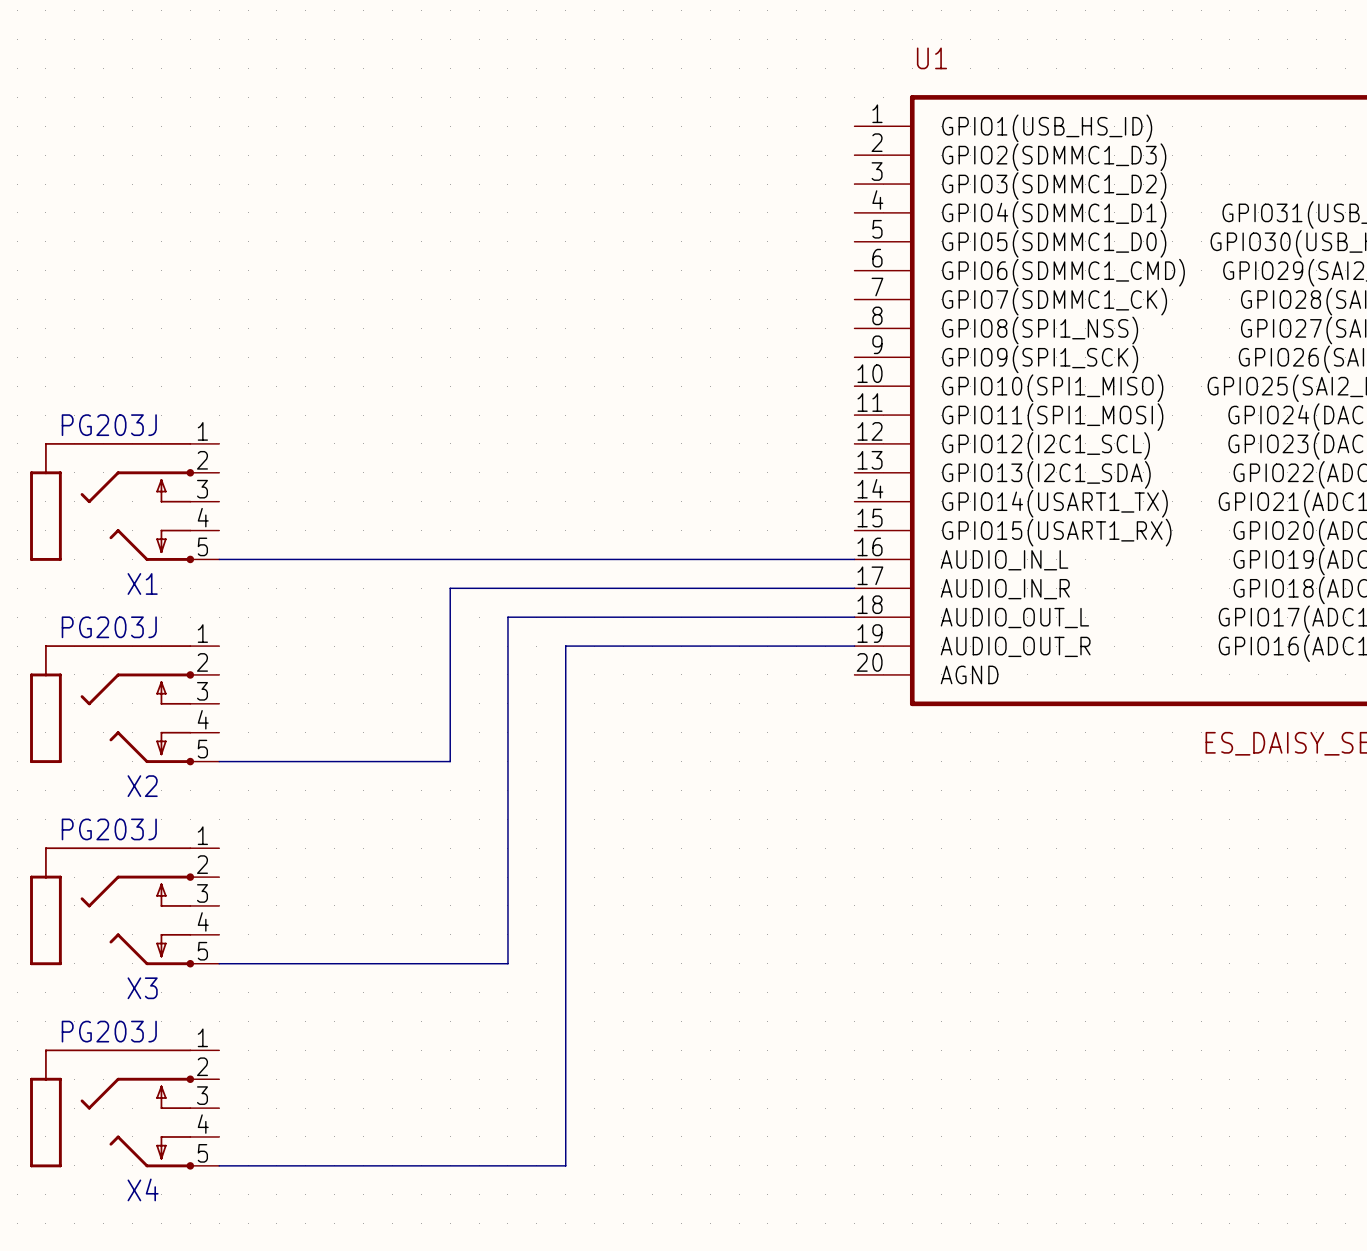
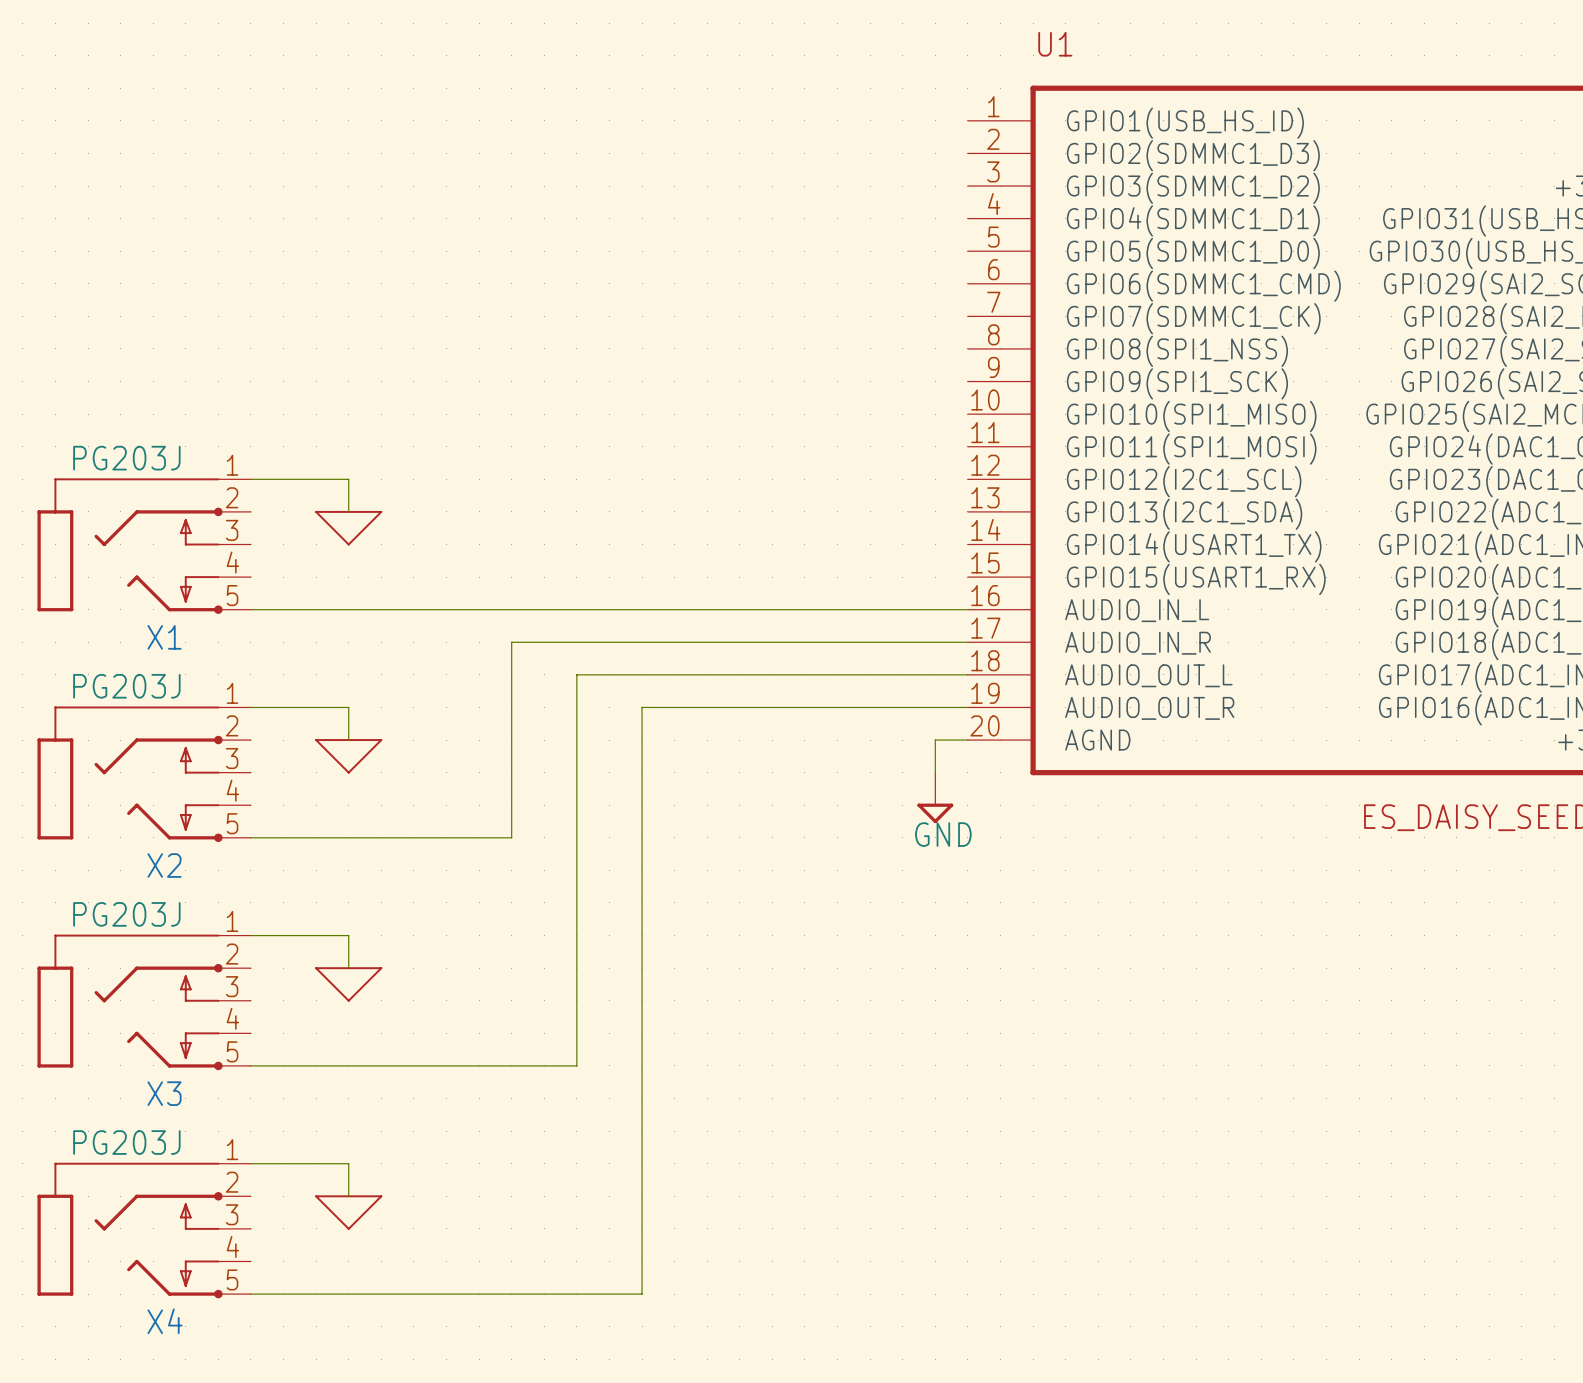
wire: none -> (250, 479) (348, 479) (348, 511)
power symbol: none -> (348, 528)
wire: none -> (250, 707) (348, 707) (348, 740)
wire: none -> (967, 740) (935, 740) (935, 772)
power symbol: none -> (348, 756)
power symbol: none -> GND (935, 797)
wire: none -> (250, 935) (348, 935) (348, 968)
power symbol: none -> (348, 984)
wire: none -> (250, 1163) (348, 1163) (348, 1196)
power symbol: none -> (348, 1212)

